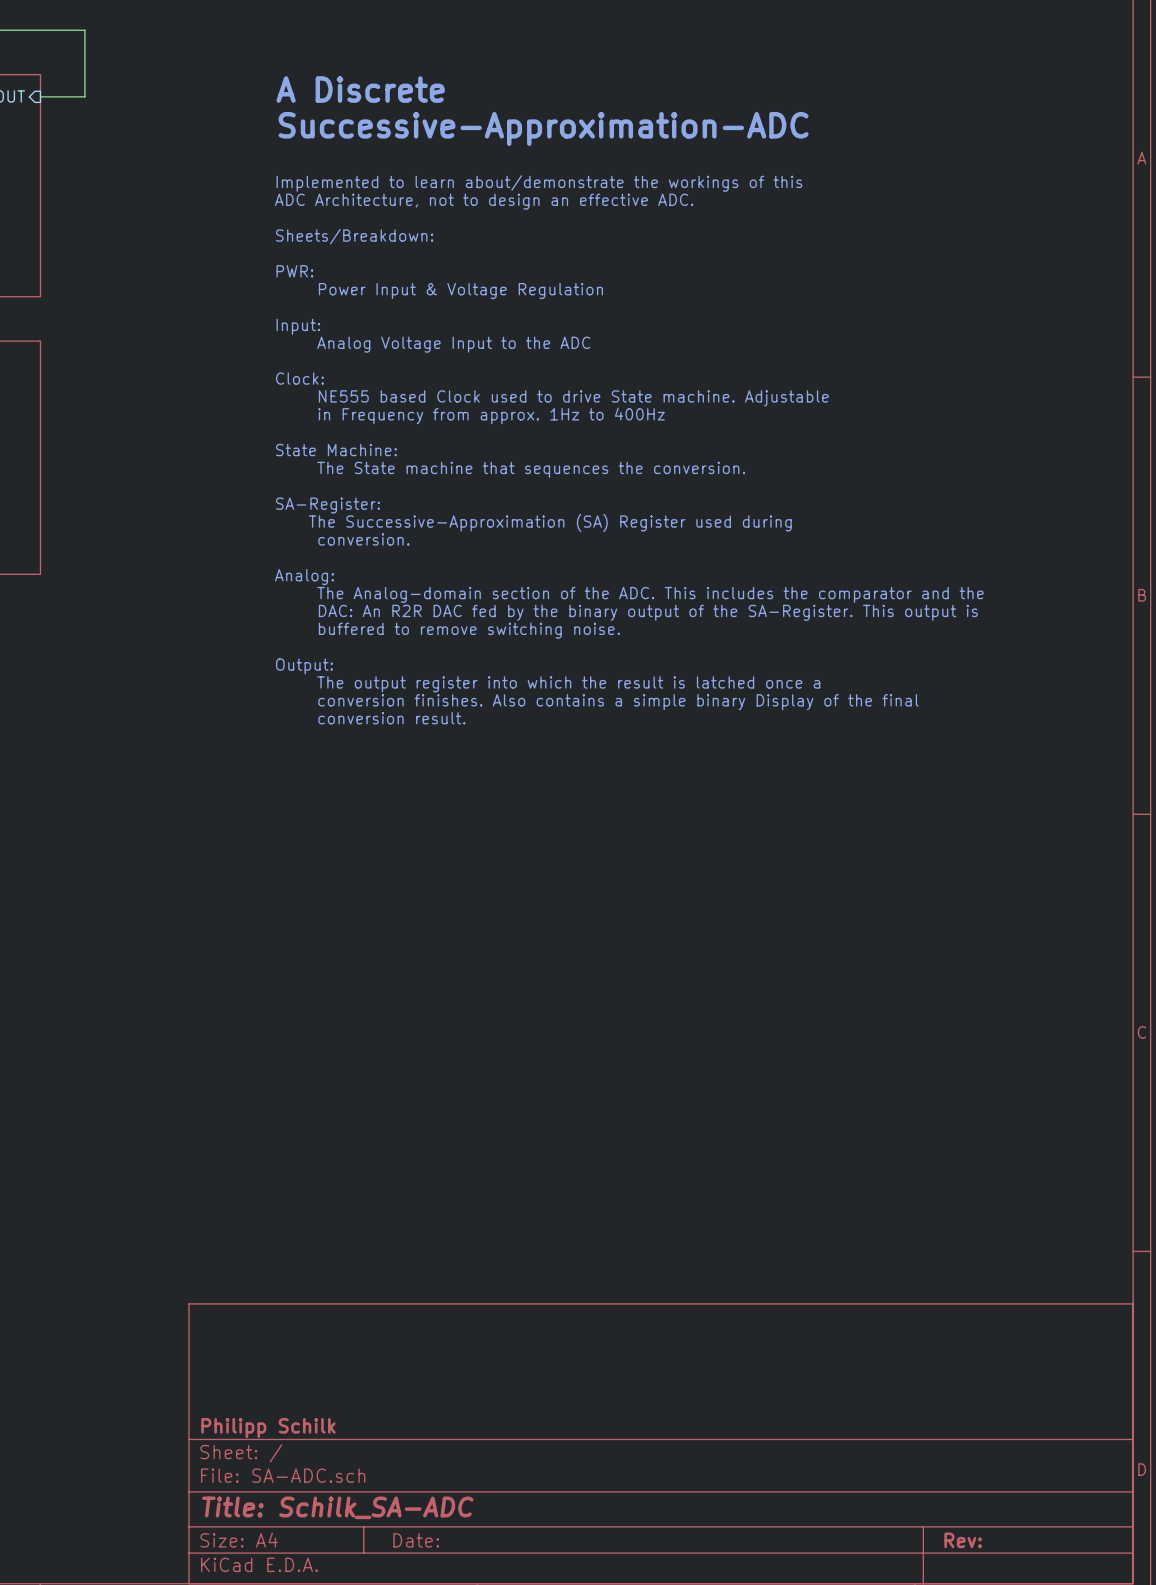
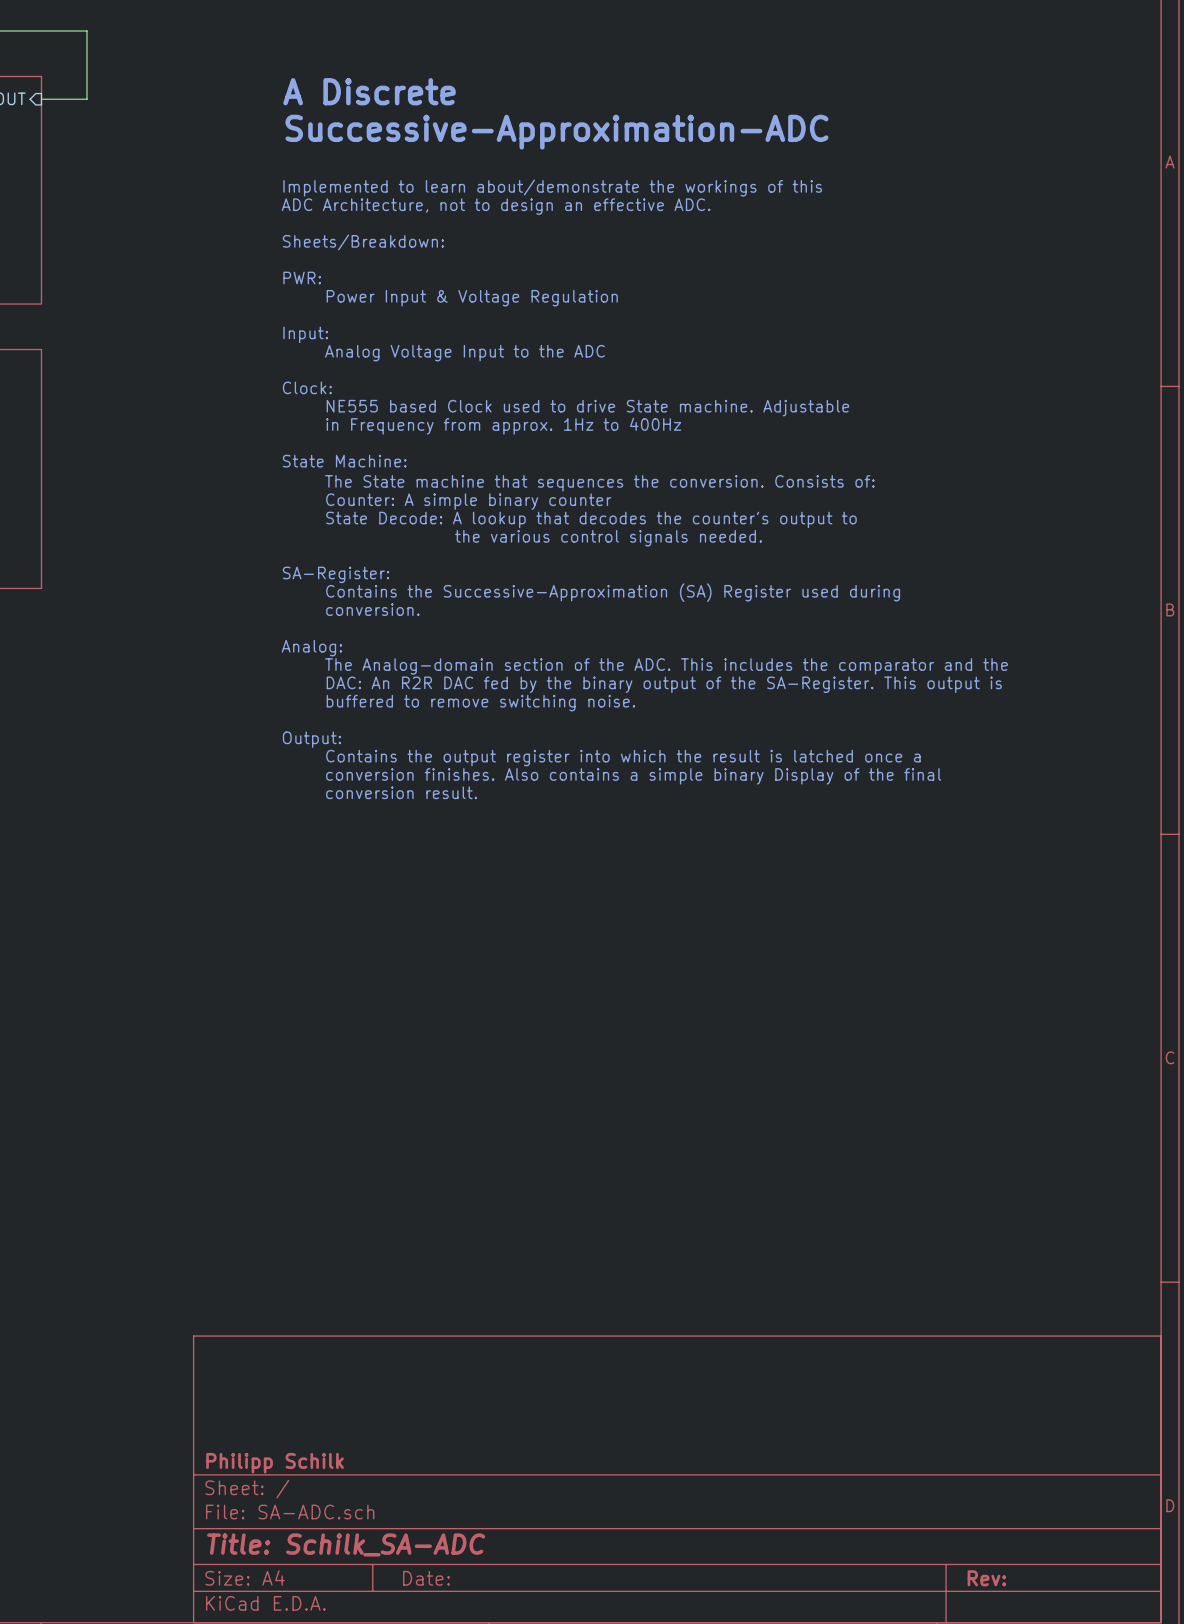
text: The State machine that sequences the conversion. (531, 469) -> The State machine that sequences the conversion. Consists of: (599, 483)
text: none -> Counter: A simple binary counter (468, 501)
text position: SA-Register: (327, 505) -> SA-Register: (336, 574)
text: none -> State Decode: A lookup that decodes the counter's output to (591, 519)
text: The Successive-Approximation (SA) Register used during (550, 522) -> the various control signals needed. (608, 538)
text position: conversion. (363, 539) -> conversion. (372, 609)
text position: Analog: (304, 577) -> Analog: (311, 648)
text: none -> Contains the Successive-Approximation (SA) Register used during (613, 592)
text position: The Analog-domain section of the ADC. This includes the comparator and the (650, 594) -> The Analog-domain section of the ADC. This includes the comparator and the (666, 666)
text position: DAC: An R2R DAC fed by the binary output of the SA-Register. This output is (648, 612) -> DAC: An R2R DAC fed by the binary output of the SA-Register. This output is (664, 684)
text position: buffered to remove switching noise. (469, 630) -> buffered to remove switching noise. (480, 703)
text position: Output: (304, 666) -> Output: (311, 739)
text: The output register into which the result is latched once a (568, 684) -> none
text position: conversion finishes. Also contains a simple binary Display of the final (618, 702) -> conversion finishes. Also contains a simple binary Display of the final (633, 776)
text position: conversion result. (391, 718) -> conversion result. (401, 792)
text: none -> Contains the output register into which the result is latched once a (623, 758)

